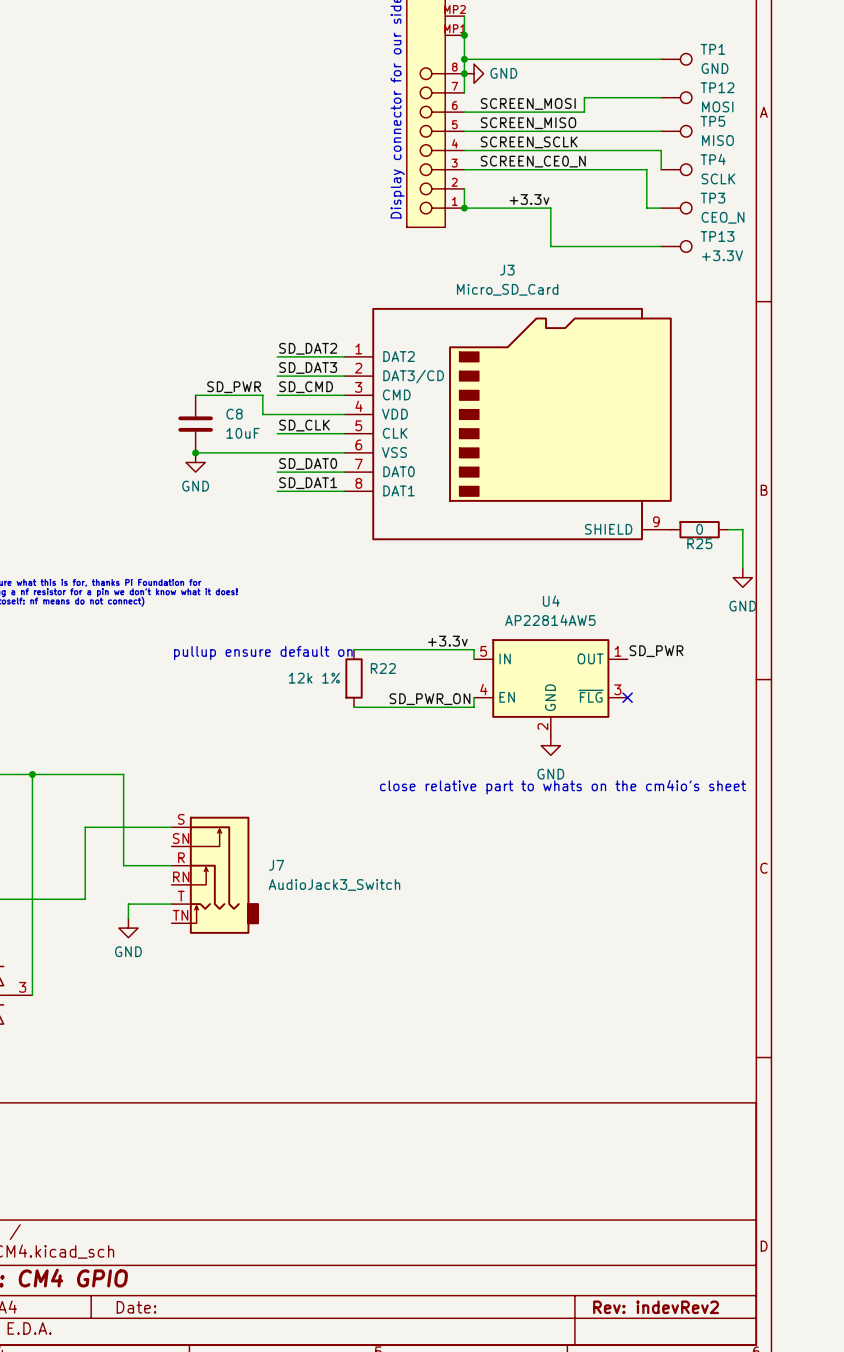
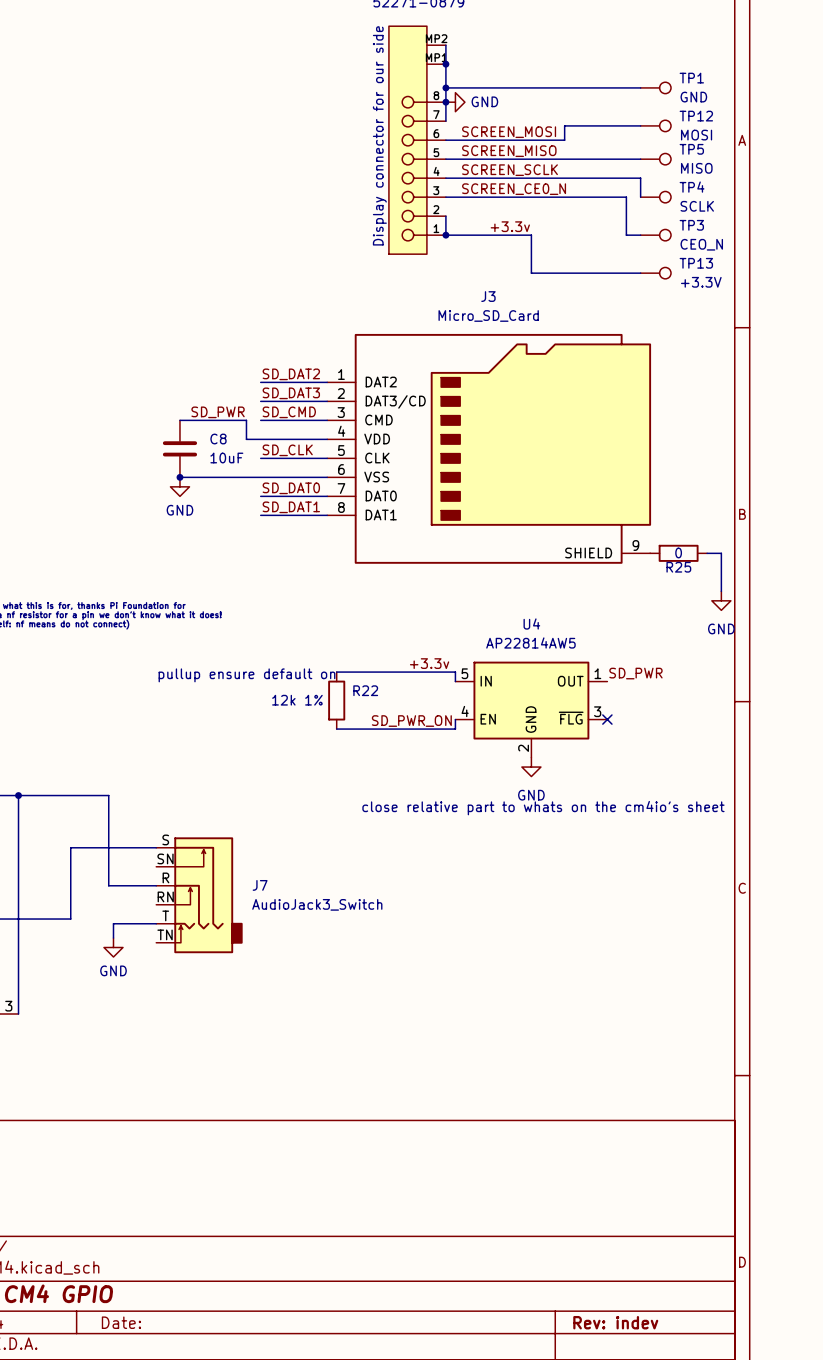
title block: Rev: indevRev2 (656, 1307) -> Rev: indev (615, 1322)

